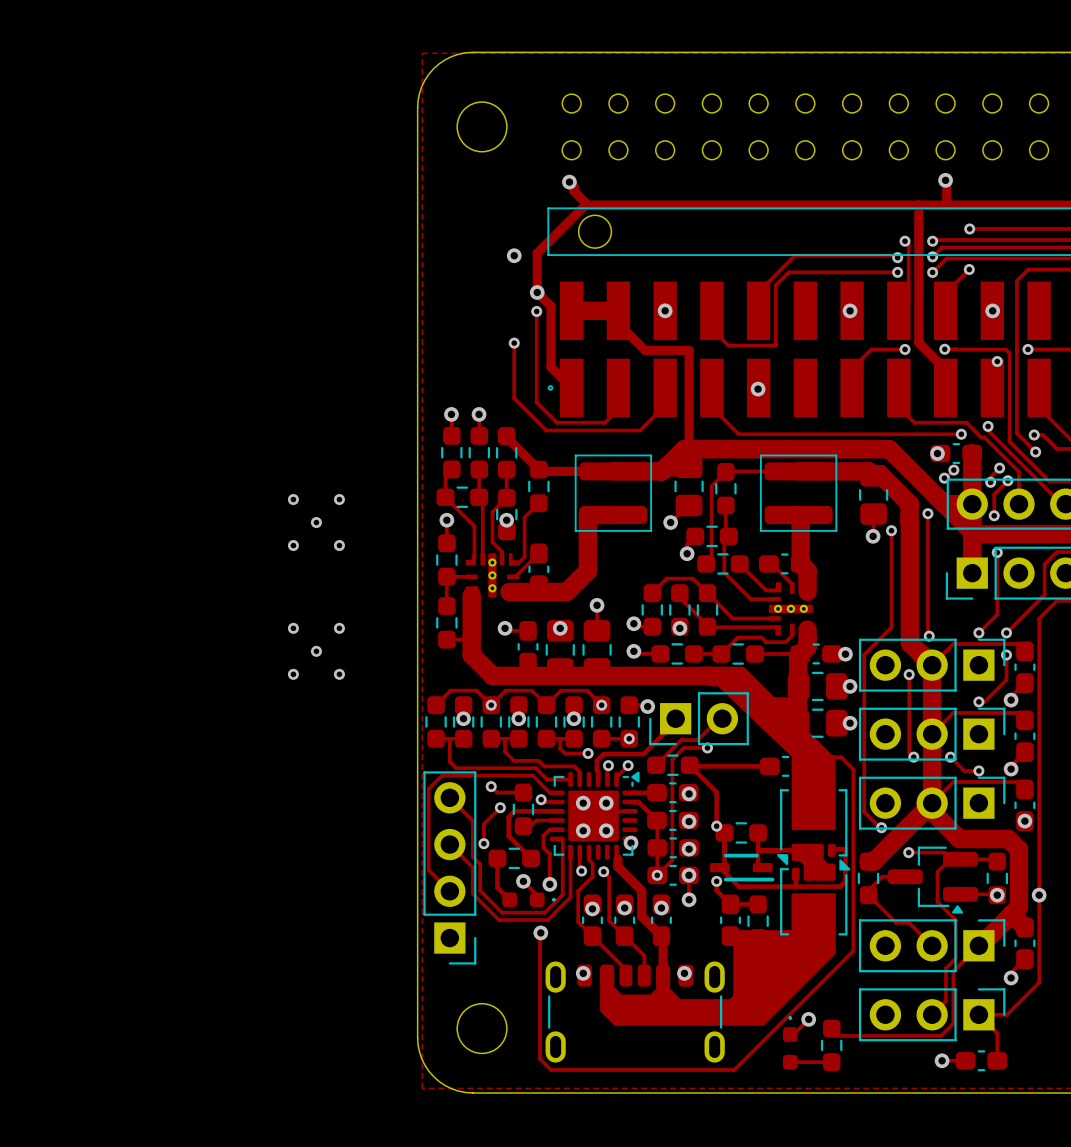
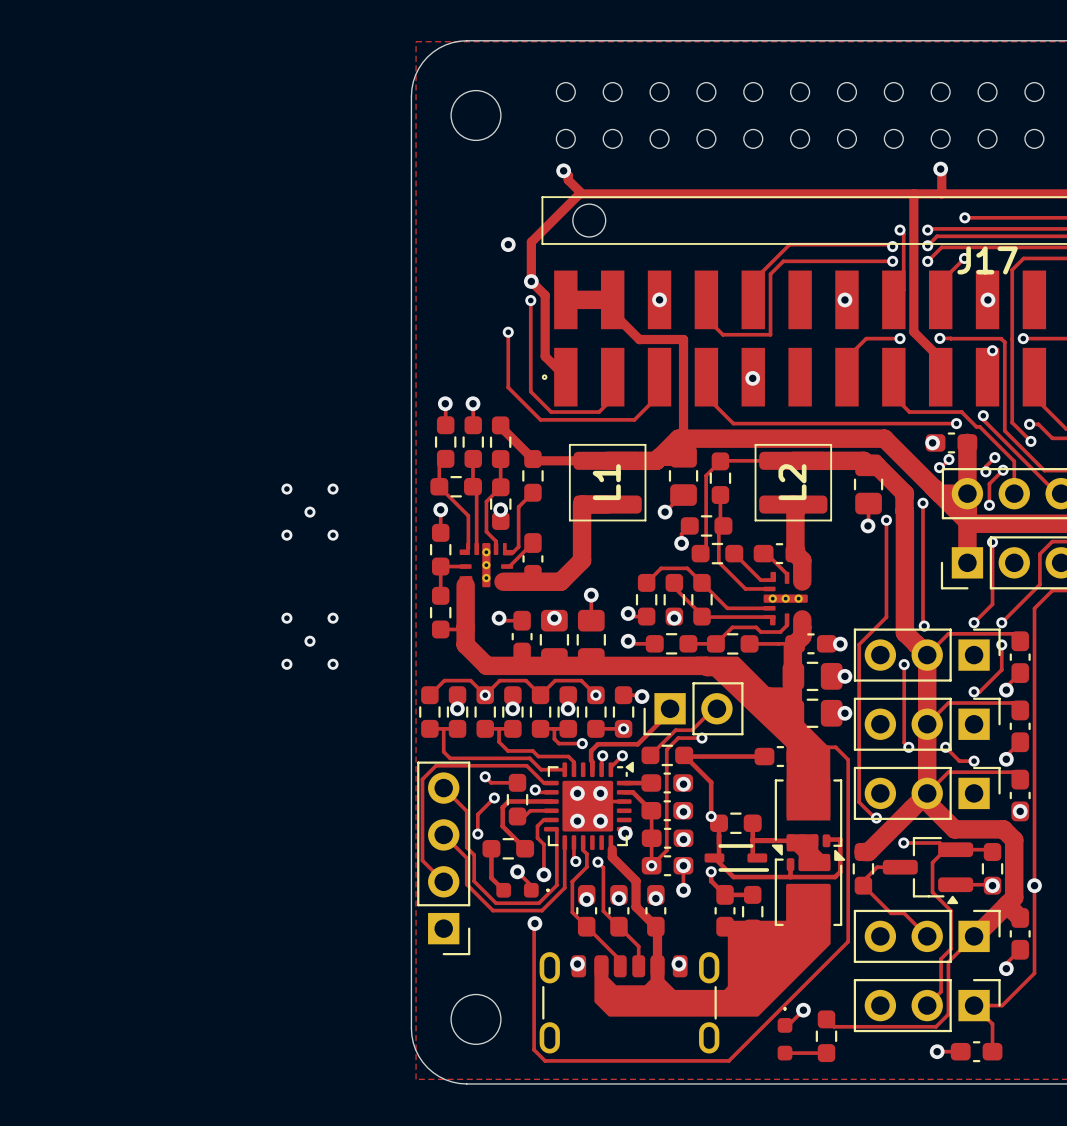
J17 name: none -> J17 (987, 260)
L1 name: none -> L1 (606, 482)
L2 name: none -> L2 (792, 482)

